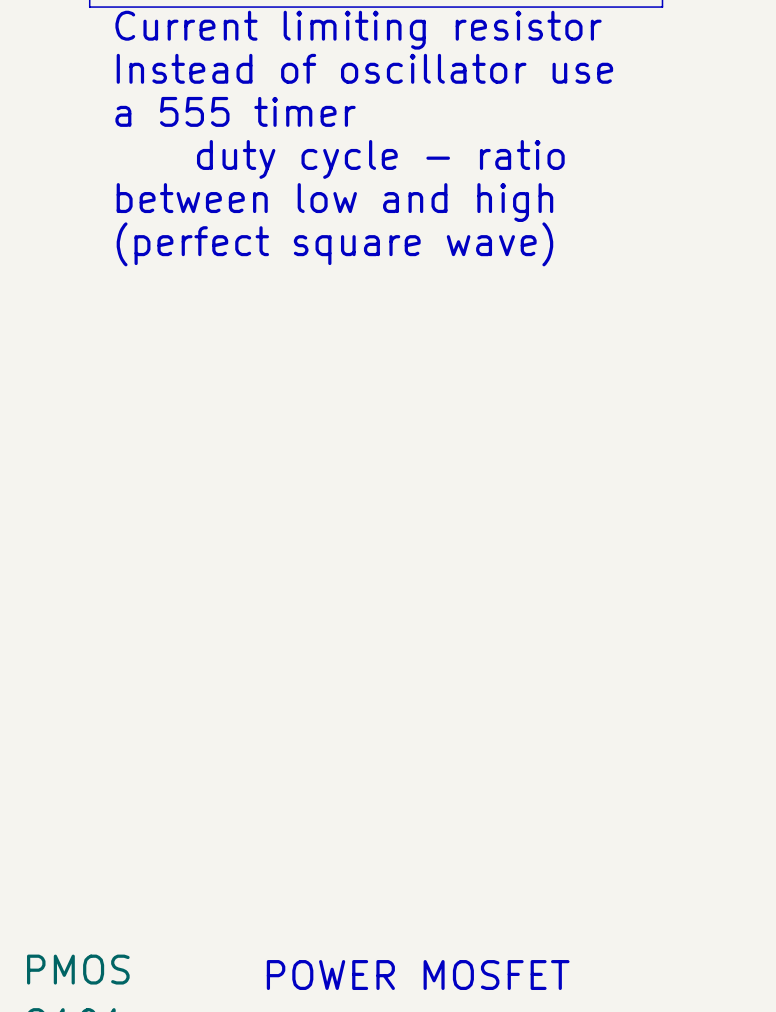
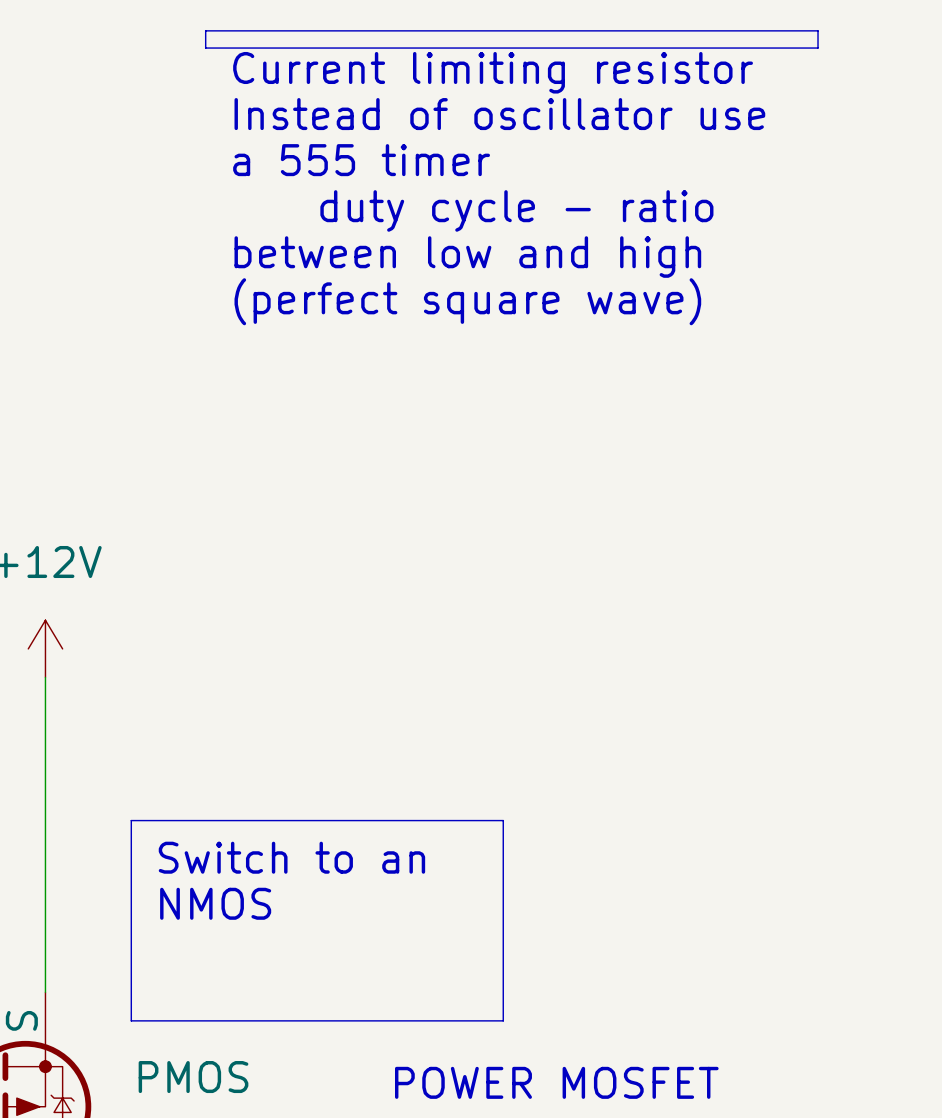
line: none -> (131, 820) (503, 820) (503, 1020) (131, 1020) (131, 820)
text: none -> Switch to an (291, 857)
text: none -> NMOS (215, 903)

